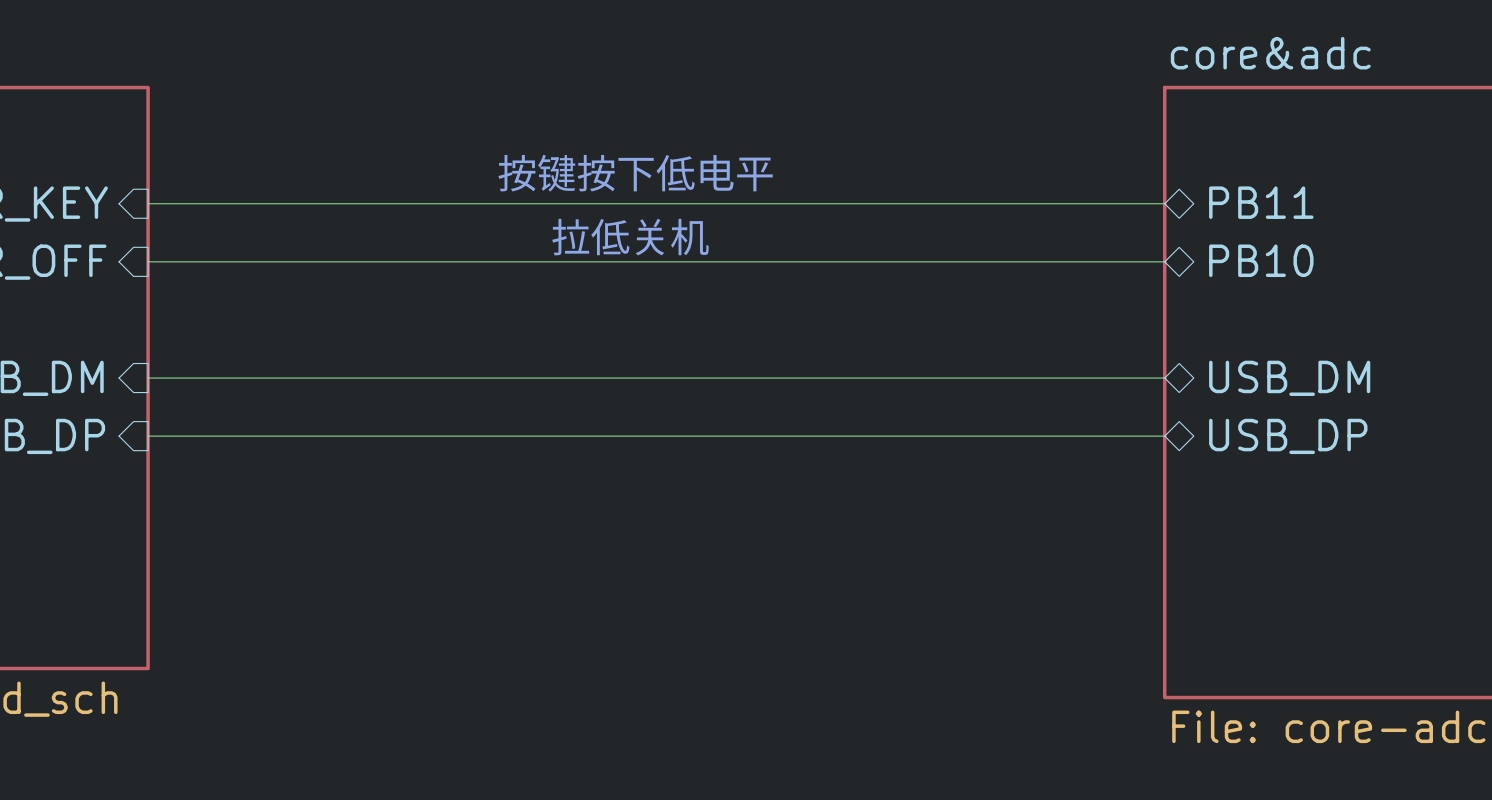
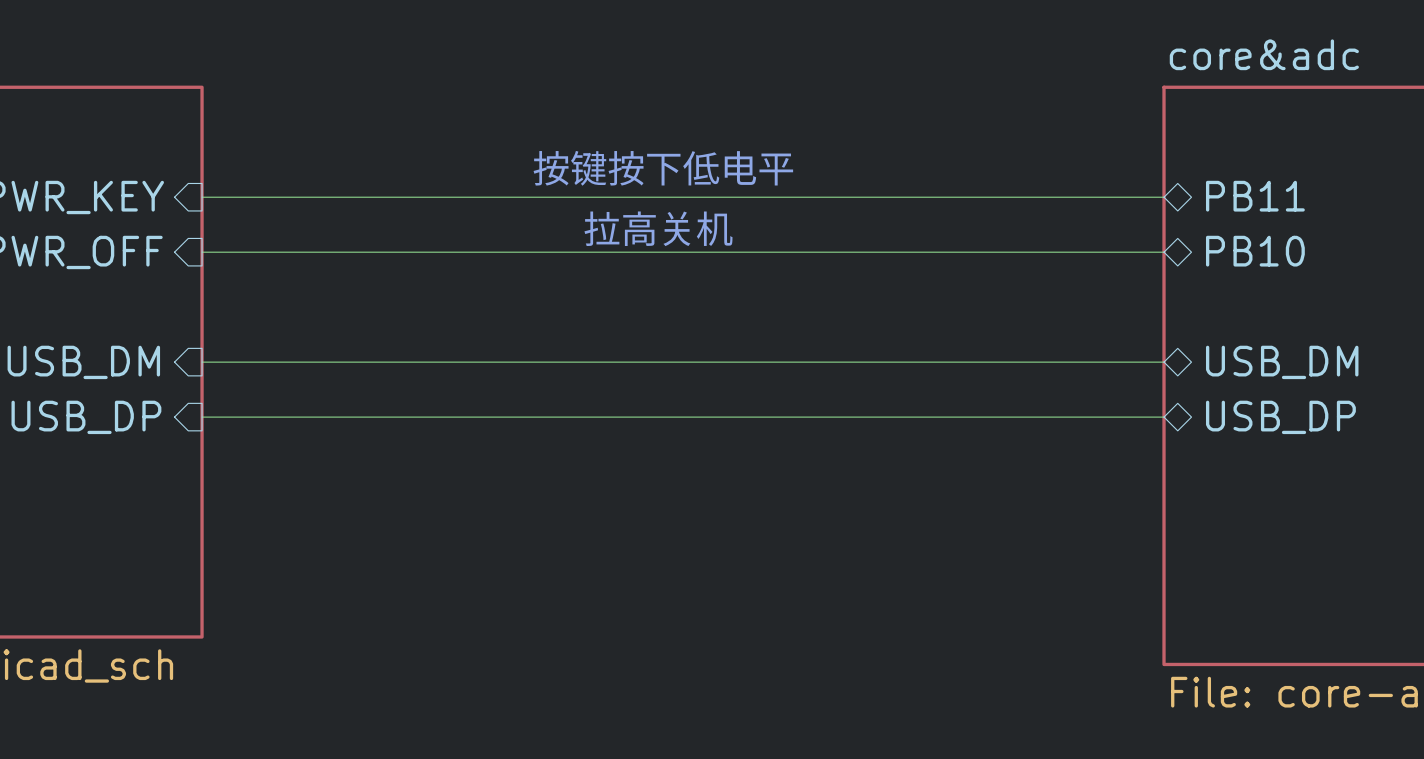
text: 拉低关机 (630, 237) -> 拉高关机 (658, 228)

